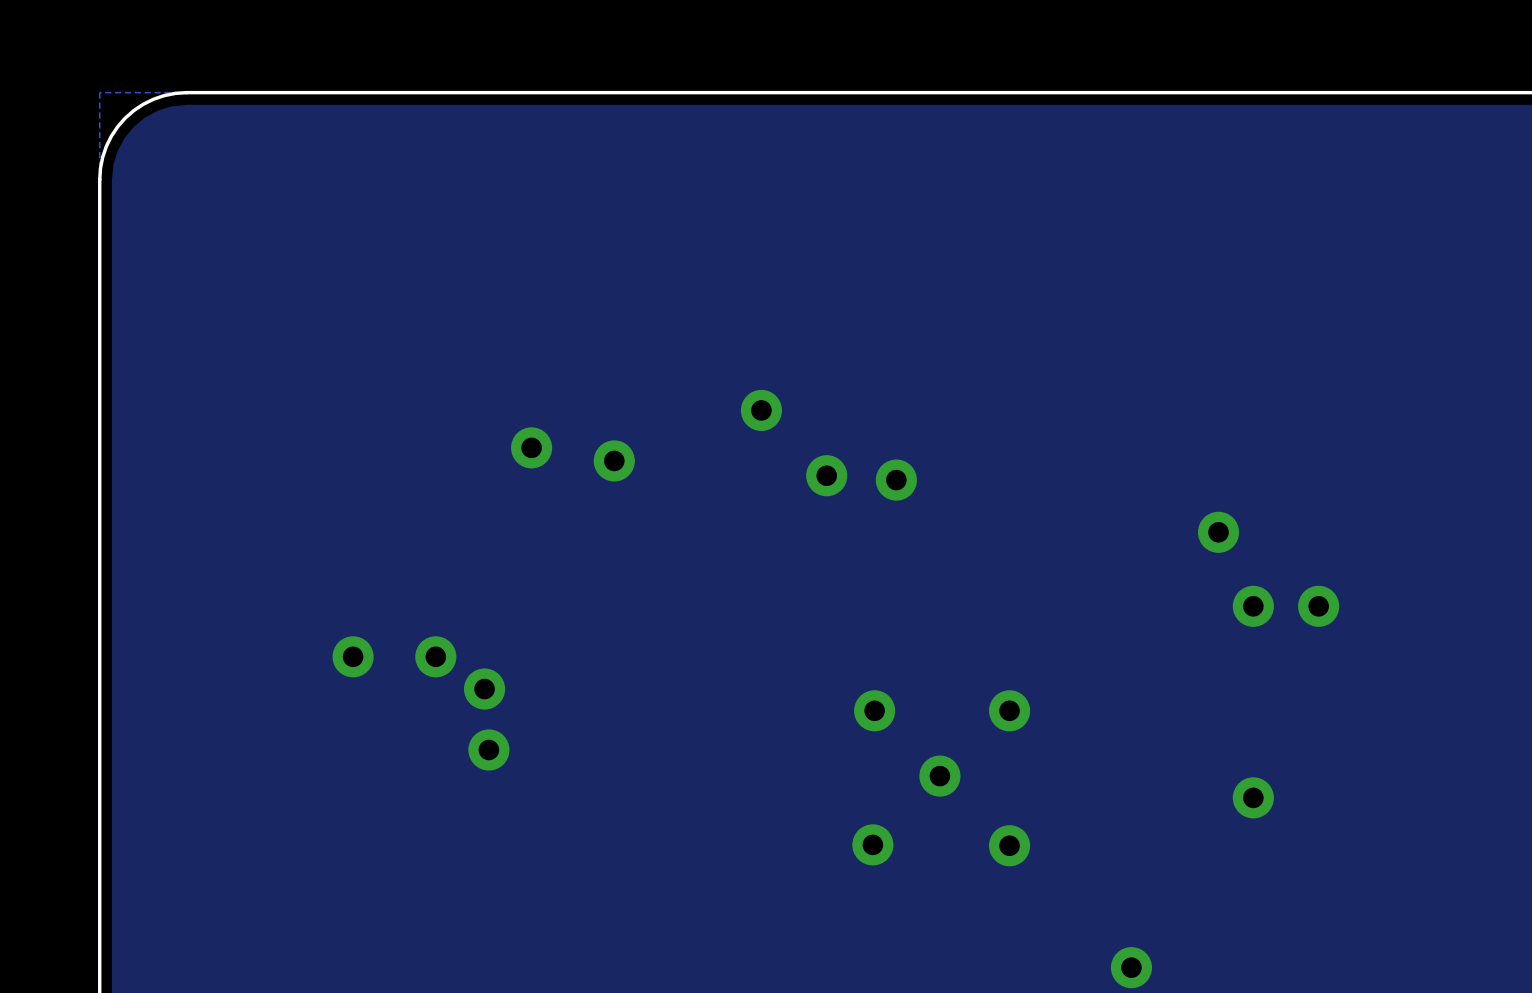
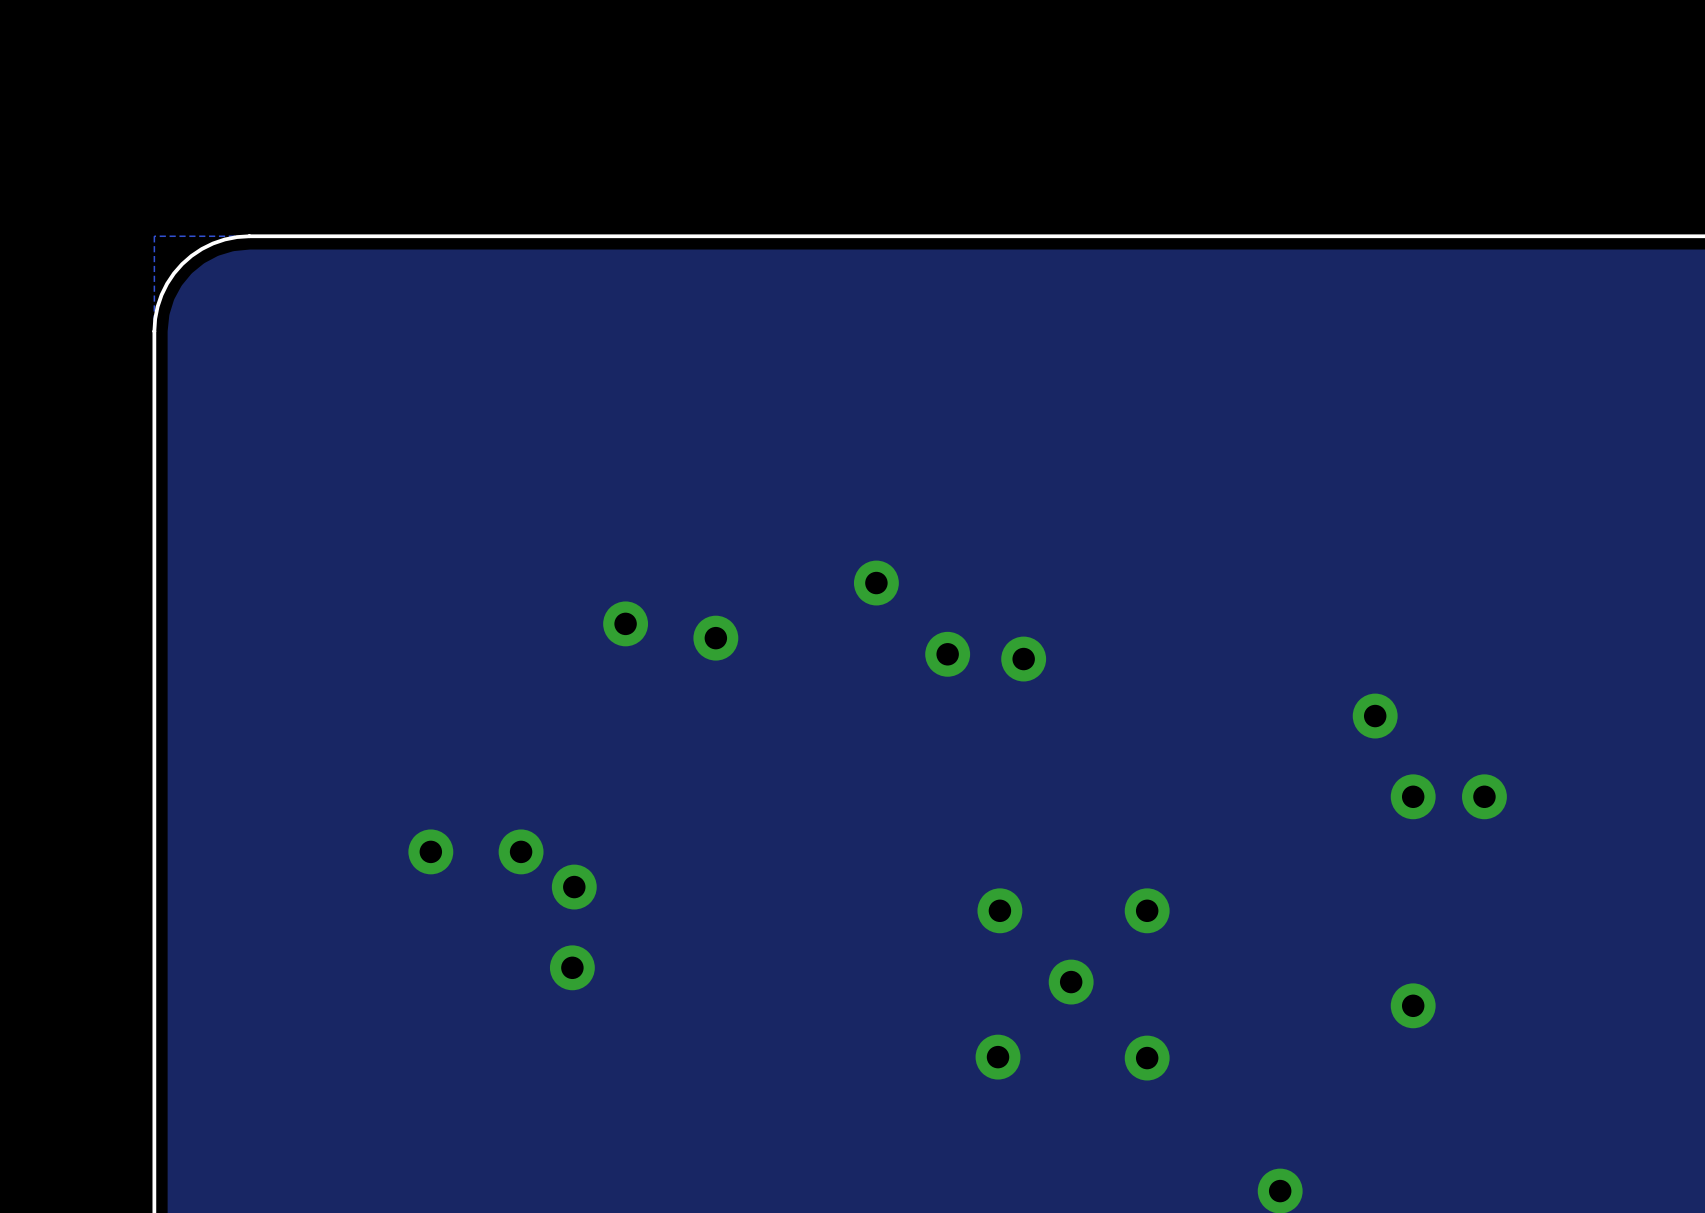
via position: (488, 749) -> (572, 967)

